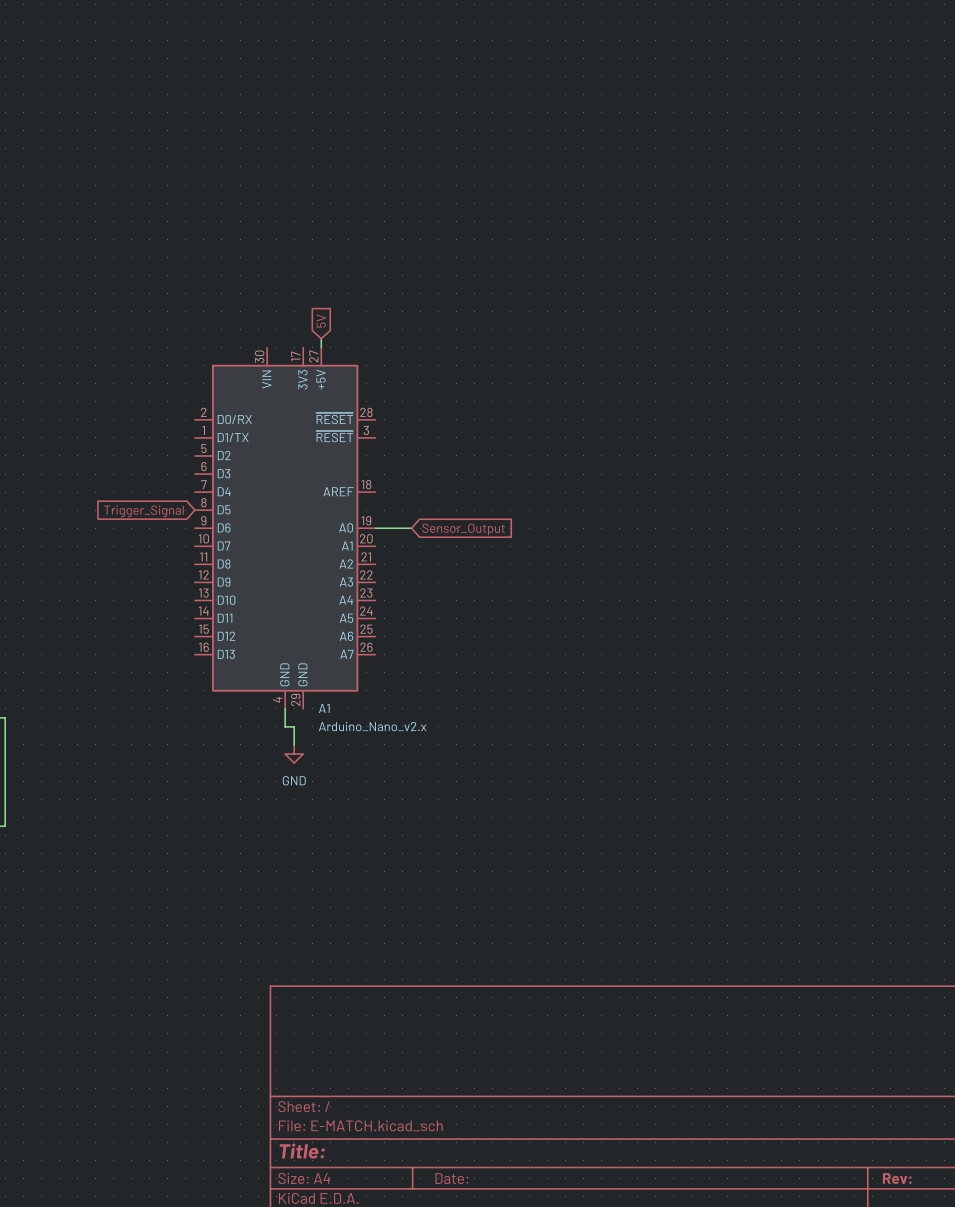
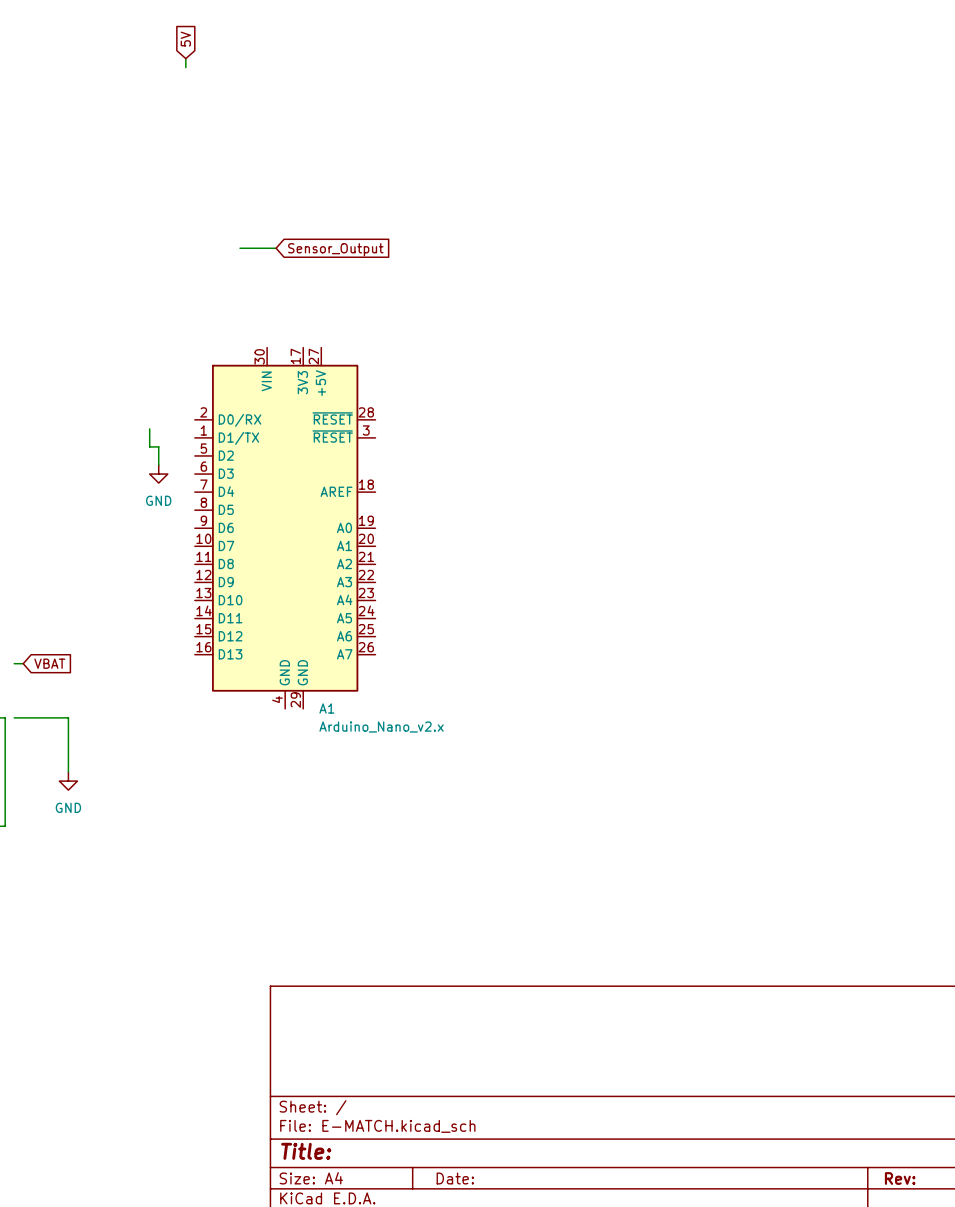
global label: none -> 5V (185, 39)
wire: none -> (185, 58) (185, 67)
wire: none -> (240, 248) (276, 248)
global label: none -> Sensor_Output (335, 249)
global label: 5V (321, 321) -> none
wire: (321, 338) (321, 347) -> none
wire: none -> (149, 428) (149, 446) (158, 446) (158, 465)
power symbol: none -> GND (158, 474)
global label: Trigger_Signal (143, 511) -> none
wire: (375, 528) (411, 528) -> none
global label: Sensor_Output (463, 529) -> none
wire: none -> (14, 663) (23, 663)
global label: none -> VBAT (49, 663)
wire: (285, 708) (285, 726) (294, 726) (294, 744) -> none
wire: none -> (14, 717) (68, 717) (68, 772)
power symbol: GND (294, 754) -> none
power symbol: none -> GND (68, 781)

